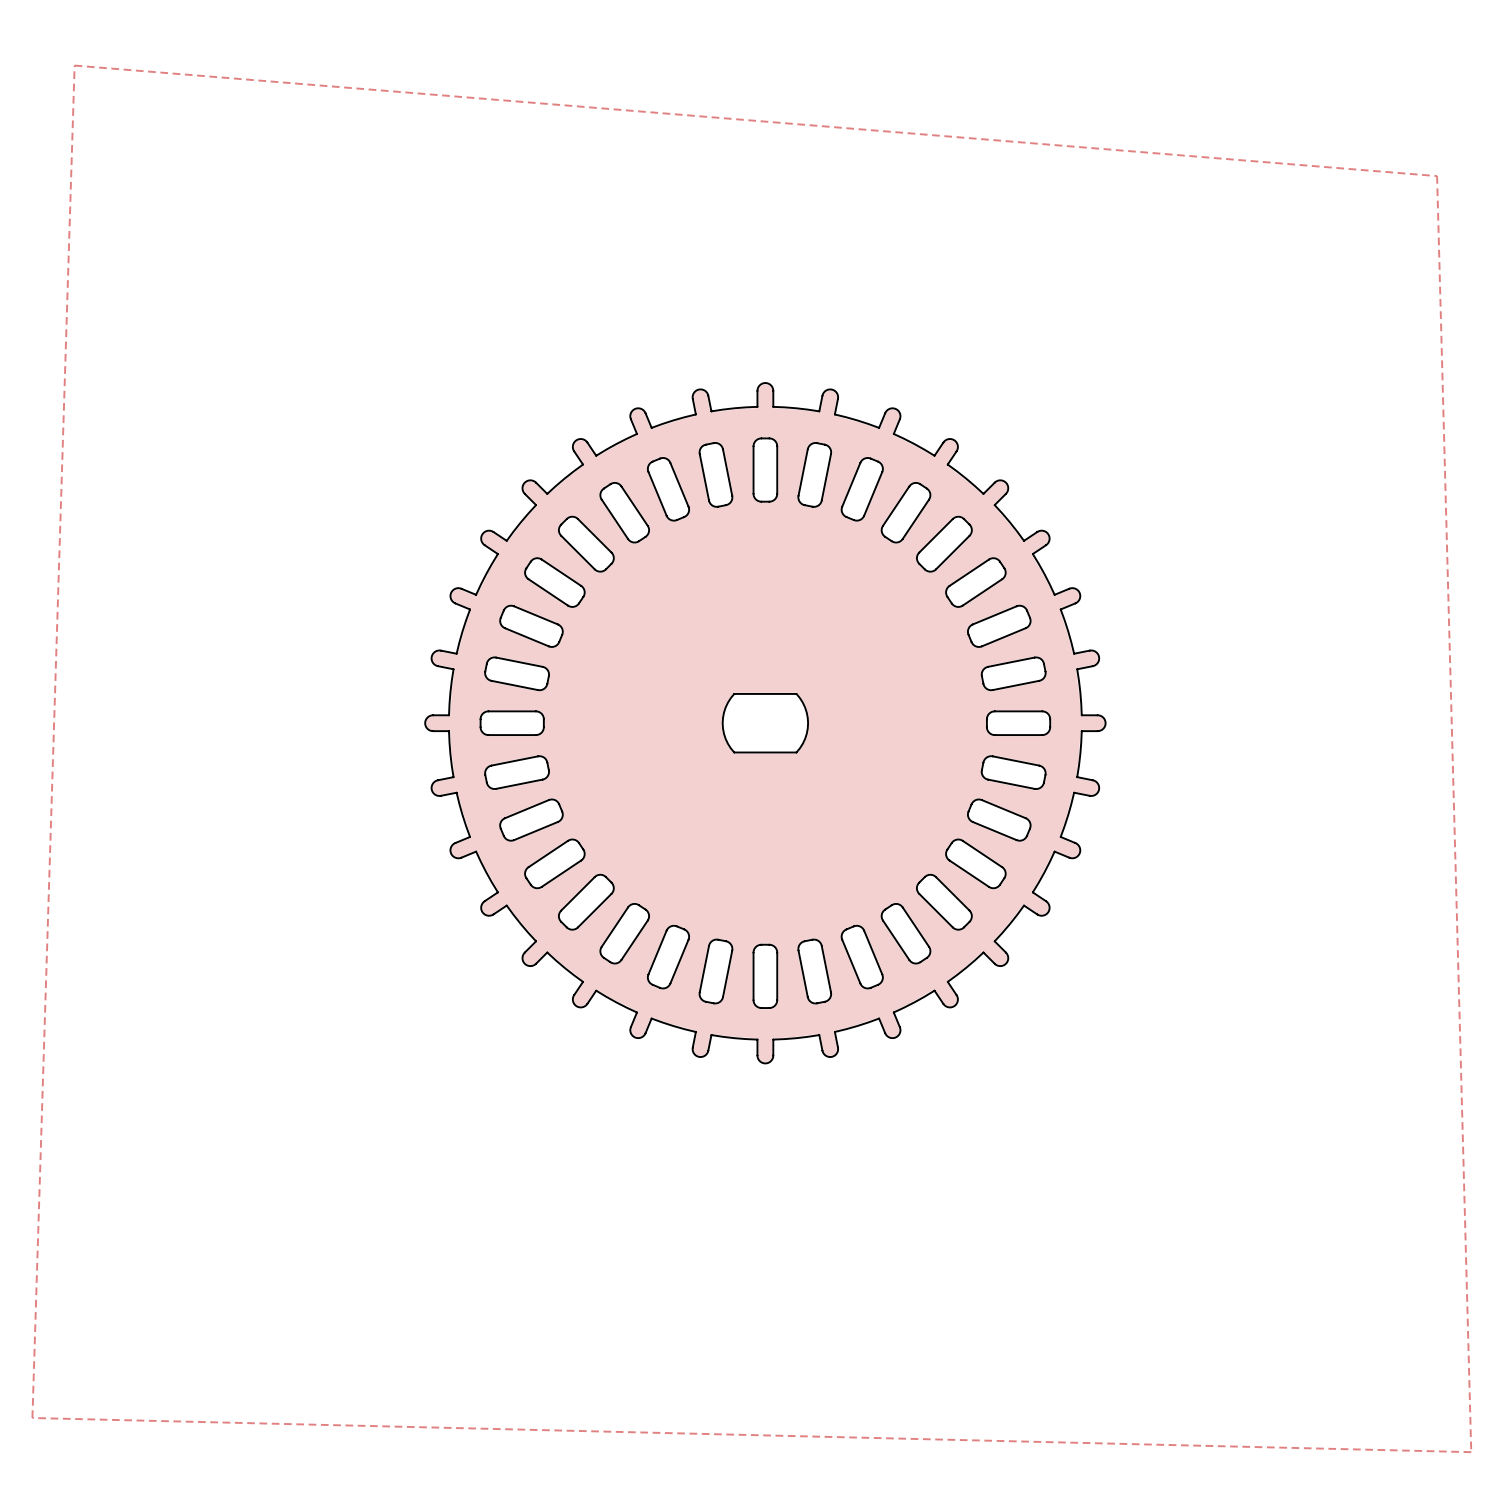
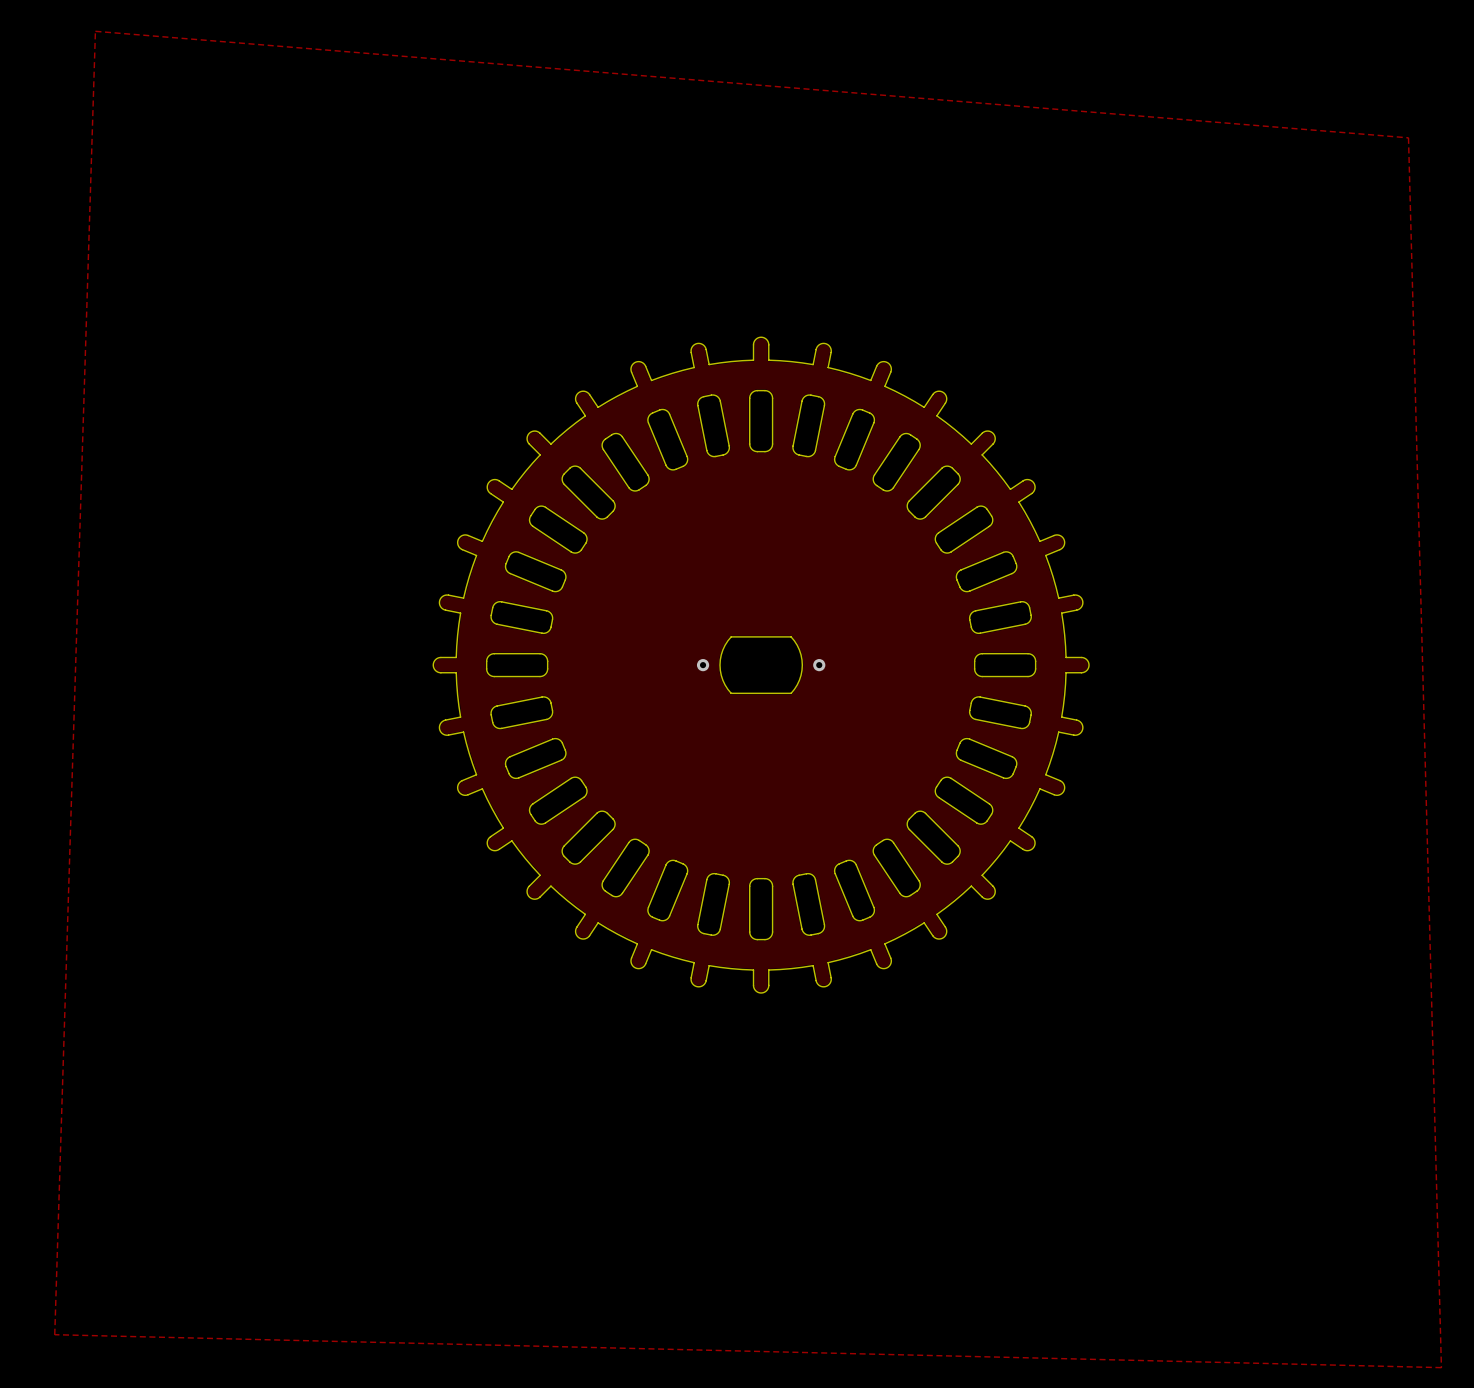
via: none -> (703, 665)
via: none -> (819, 665)

